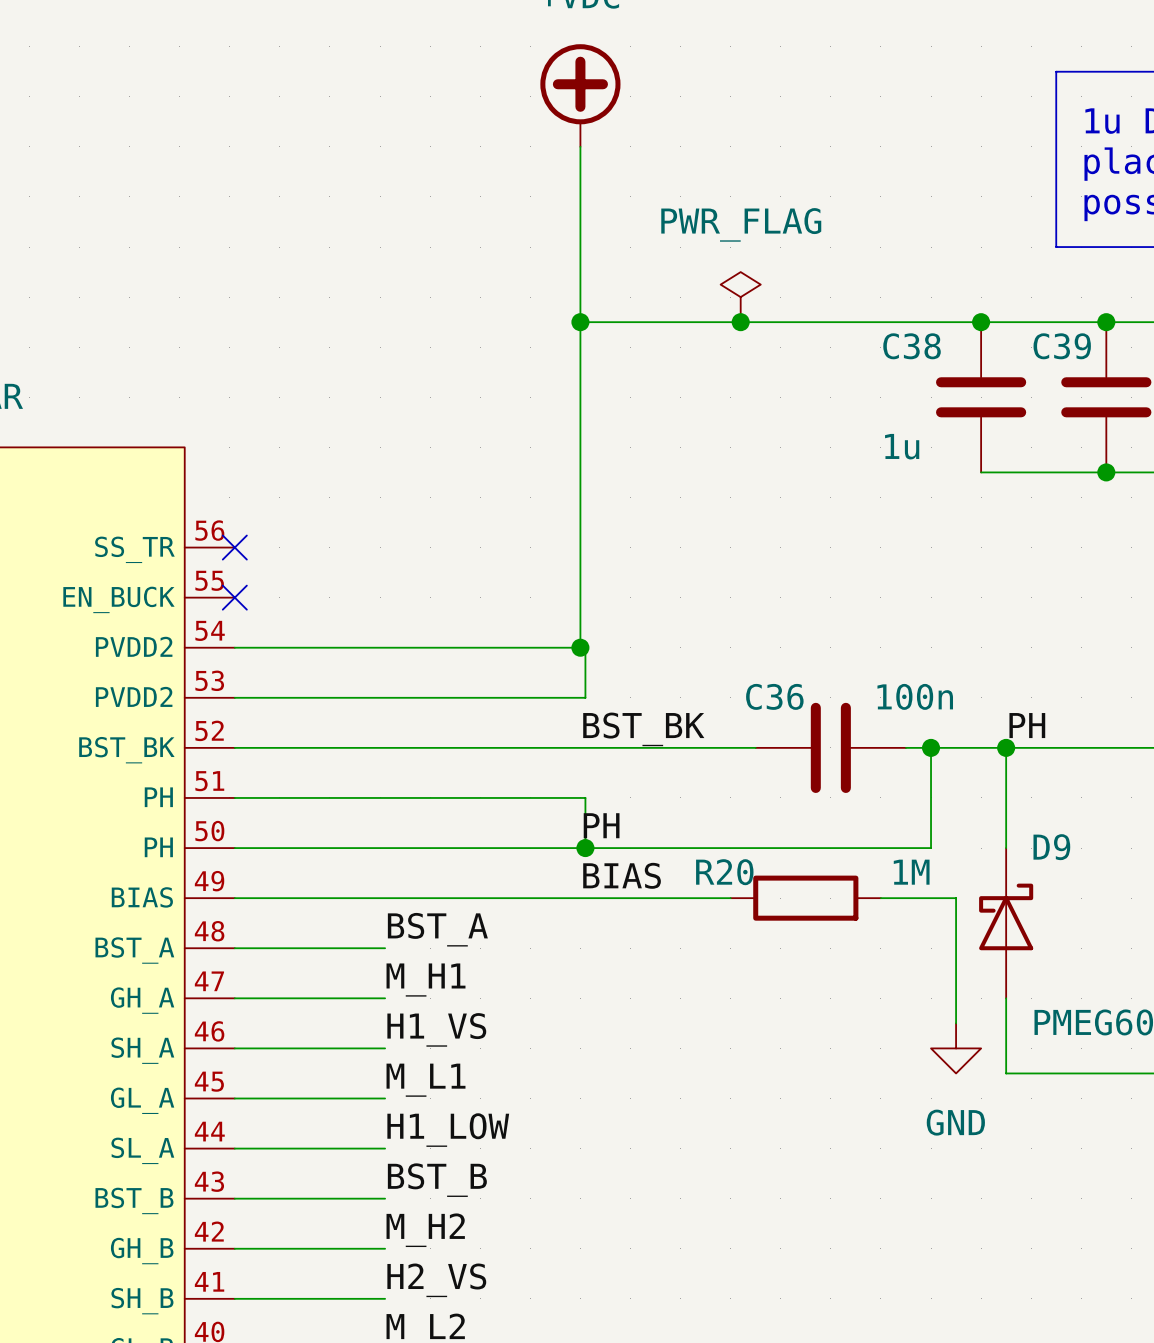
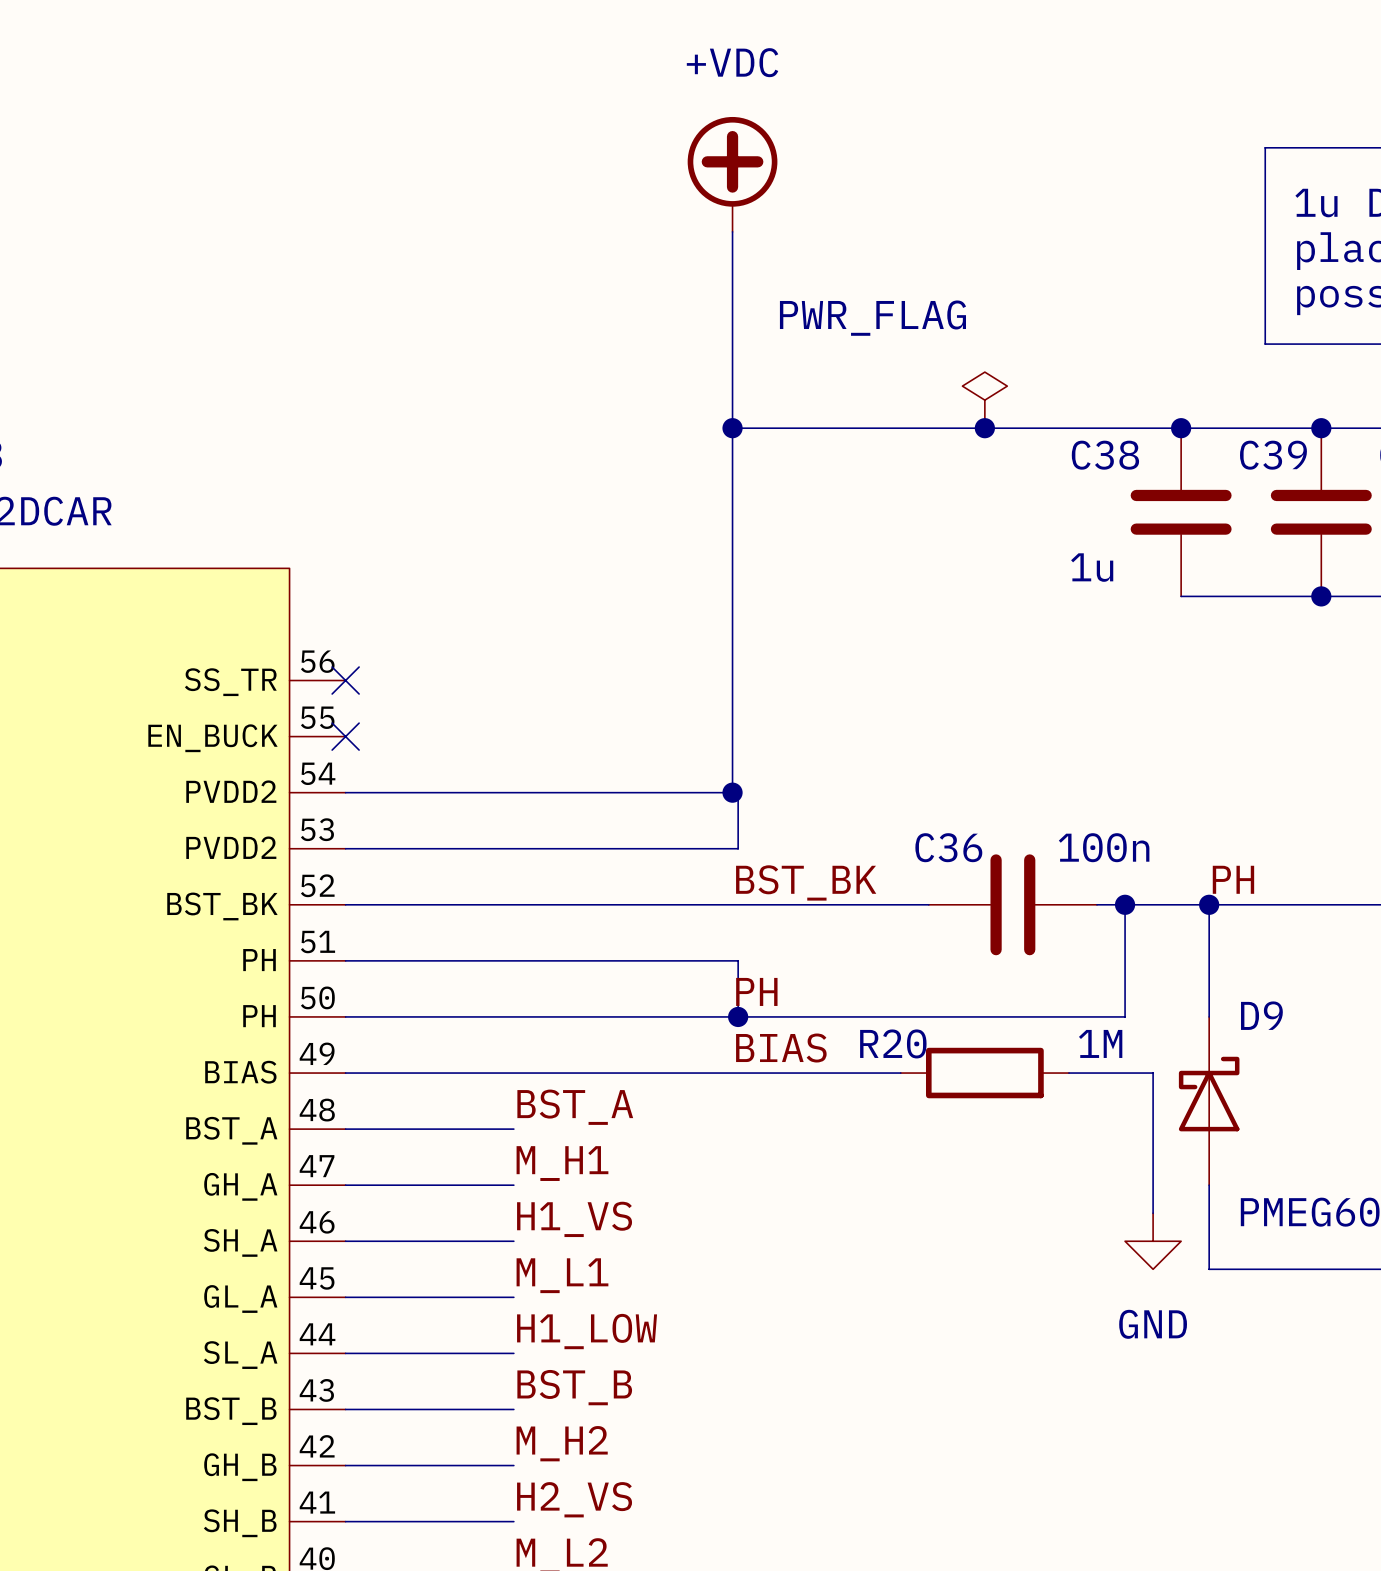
power symbol text position: PWR_FLAG (741, 224) -> PWR_FLAG (872, 318)
power symbol position: PWR_FLAG (740, 297) -> PWR_FLAG (984, 400)
junction position: (740, 322) -> (984, 428)

